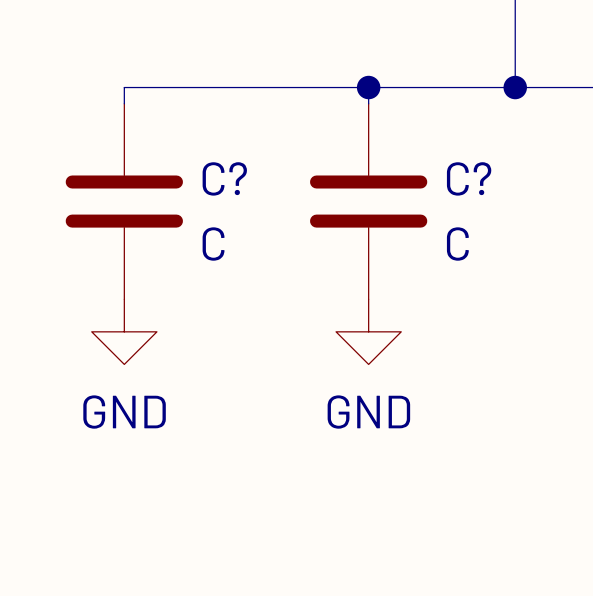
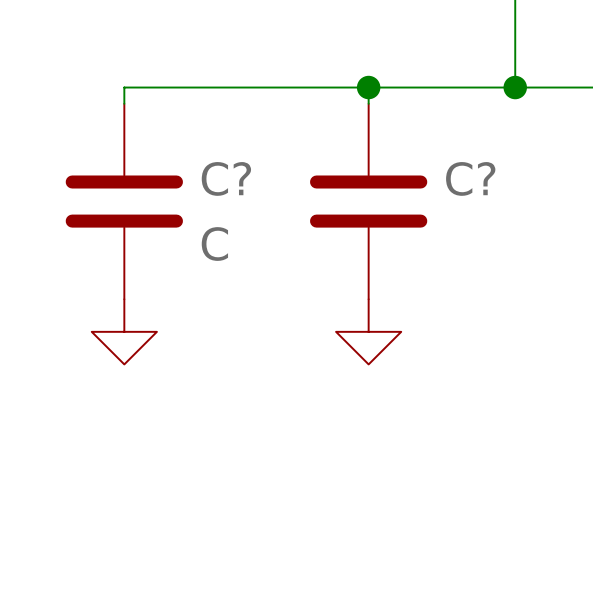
C? value: C (457, 244) -> none
power symbol text: GND (124, 412) -> none
power symbol text: GND (368, 412) -> none

